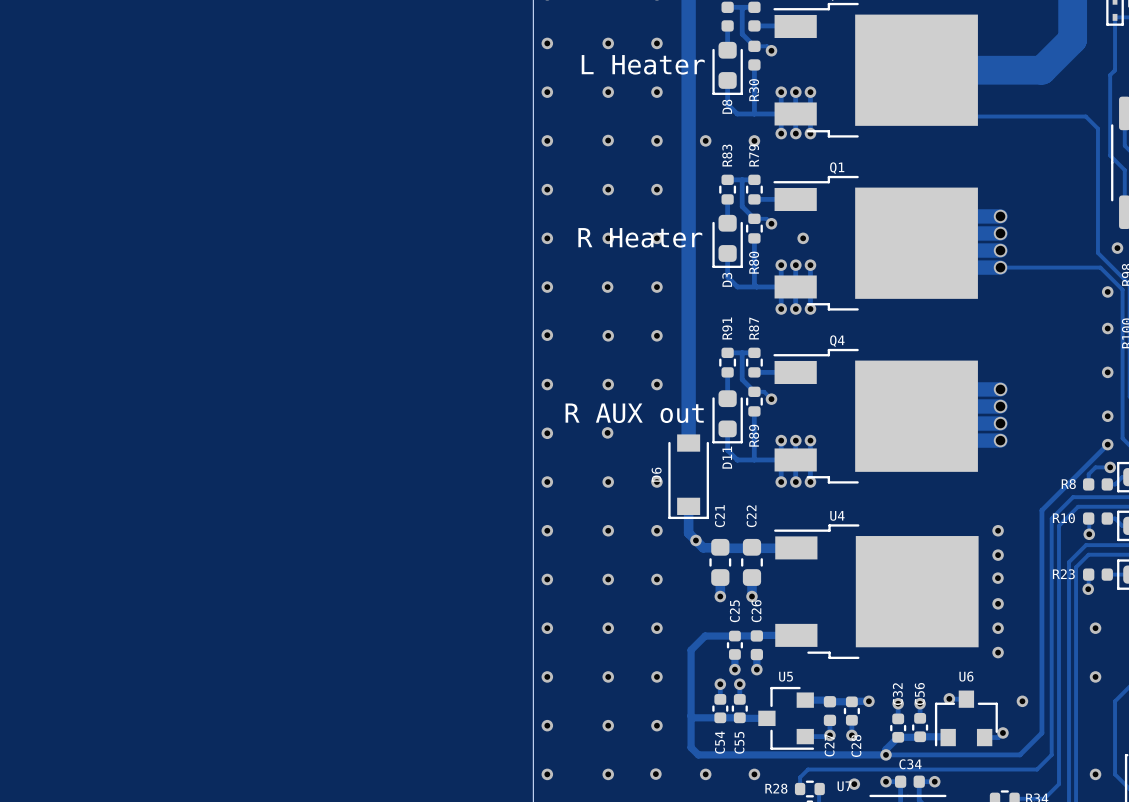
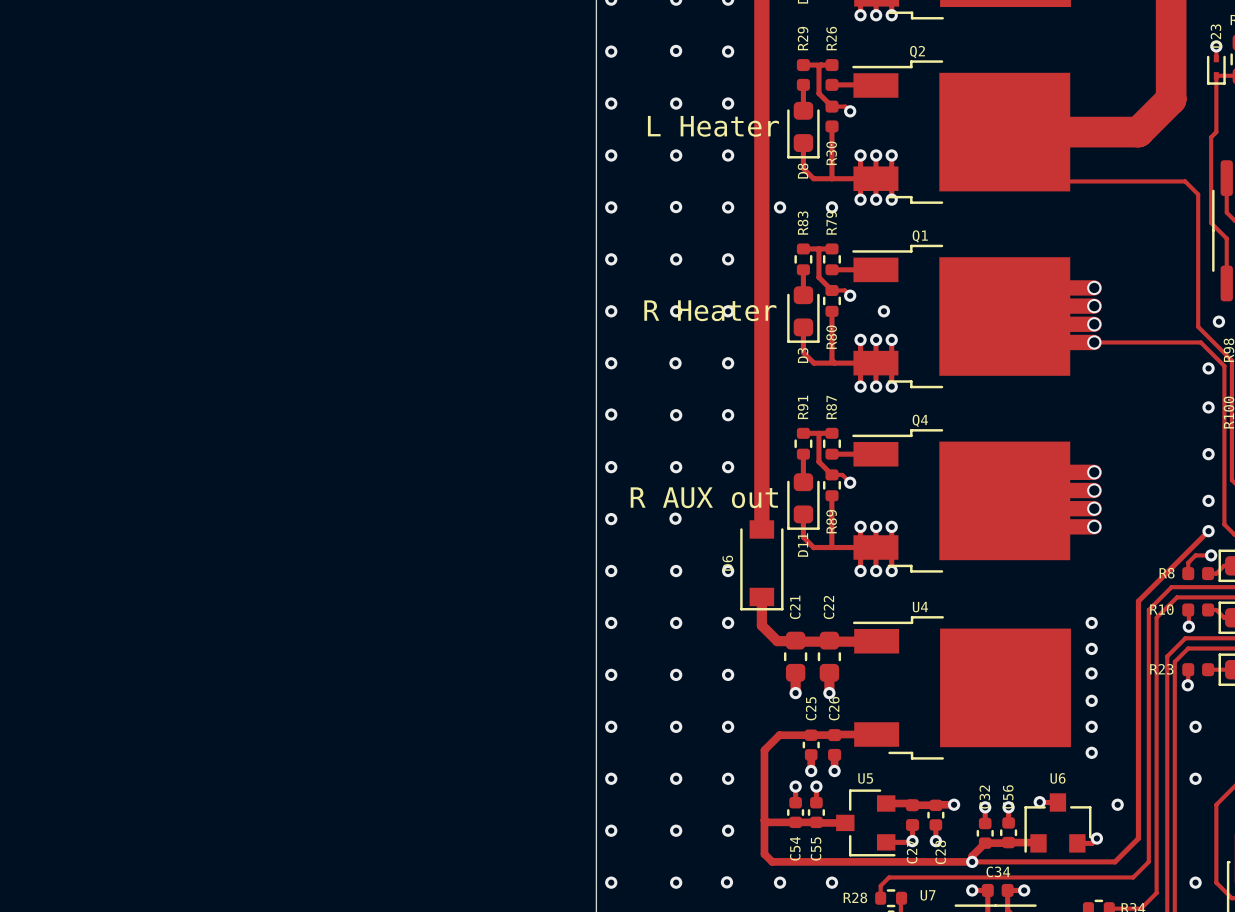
via: (695, 540) -> none
via: (854, 784) -> none

